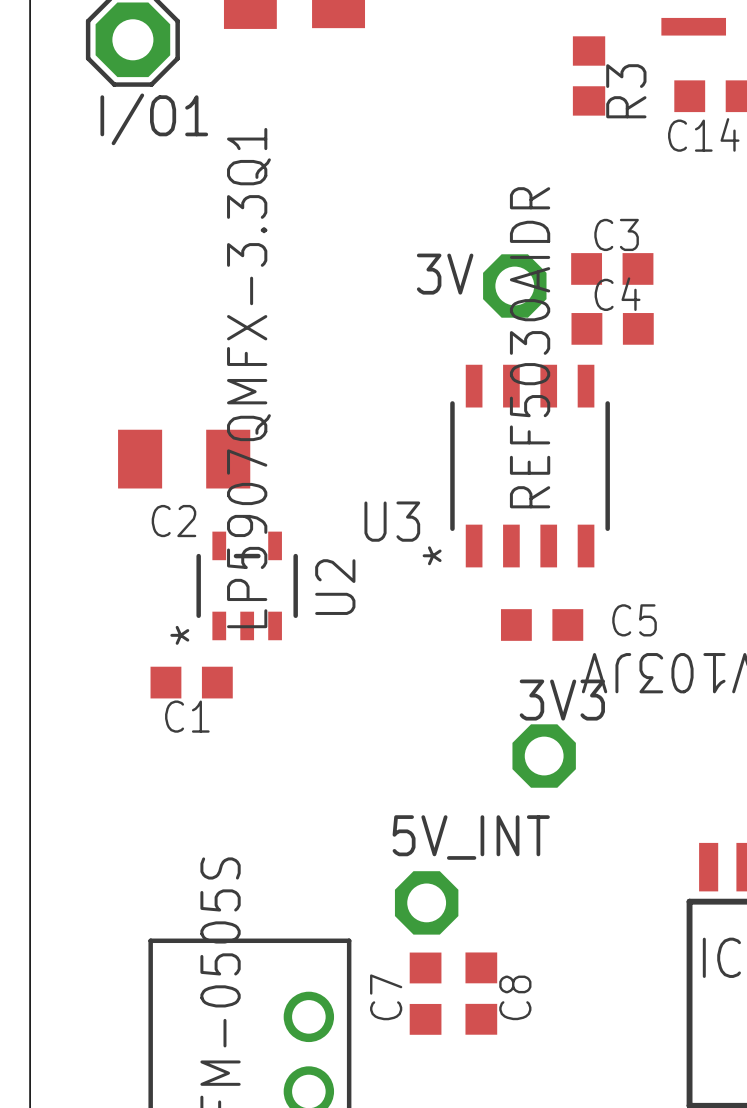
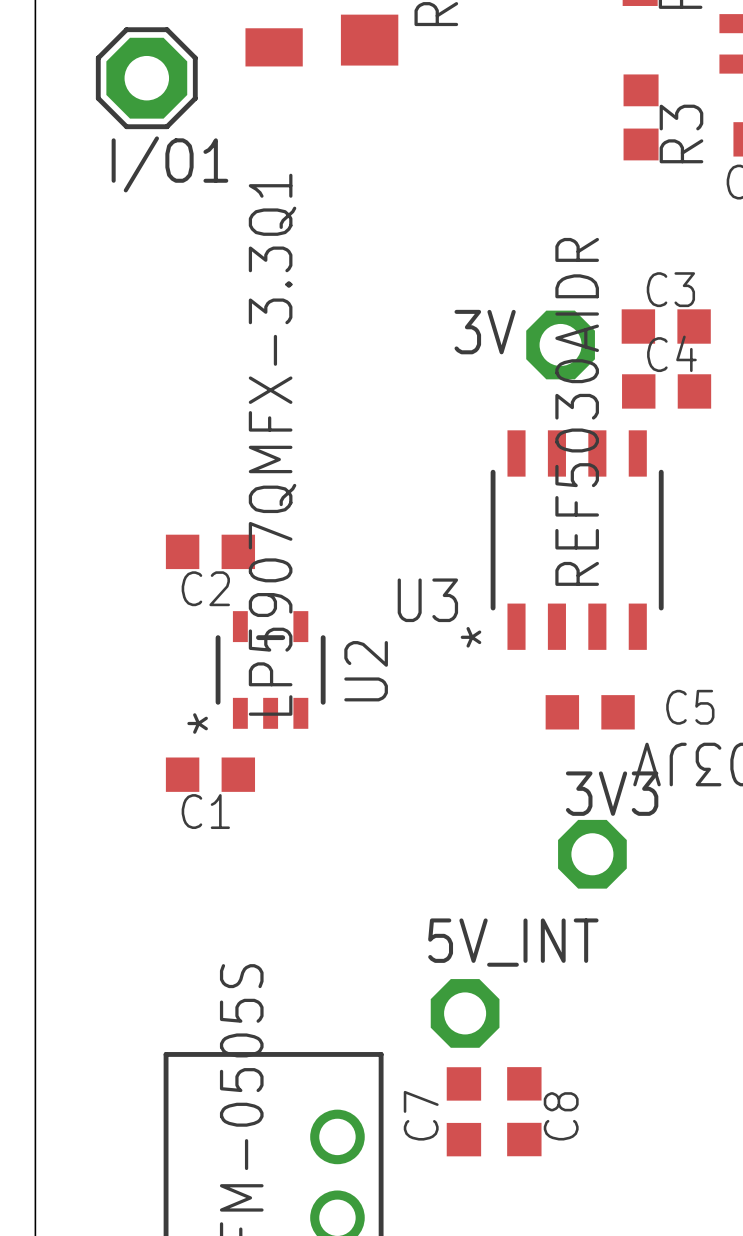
C2 footprint: [118, 429, 251, 489] -> [165, 534, 256, 570]

